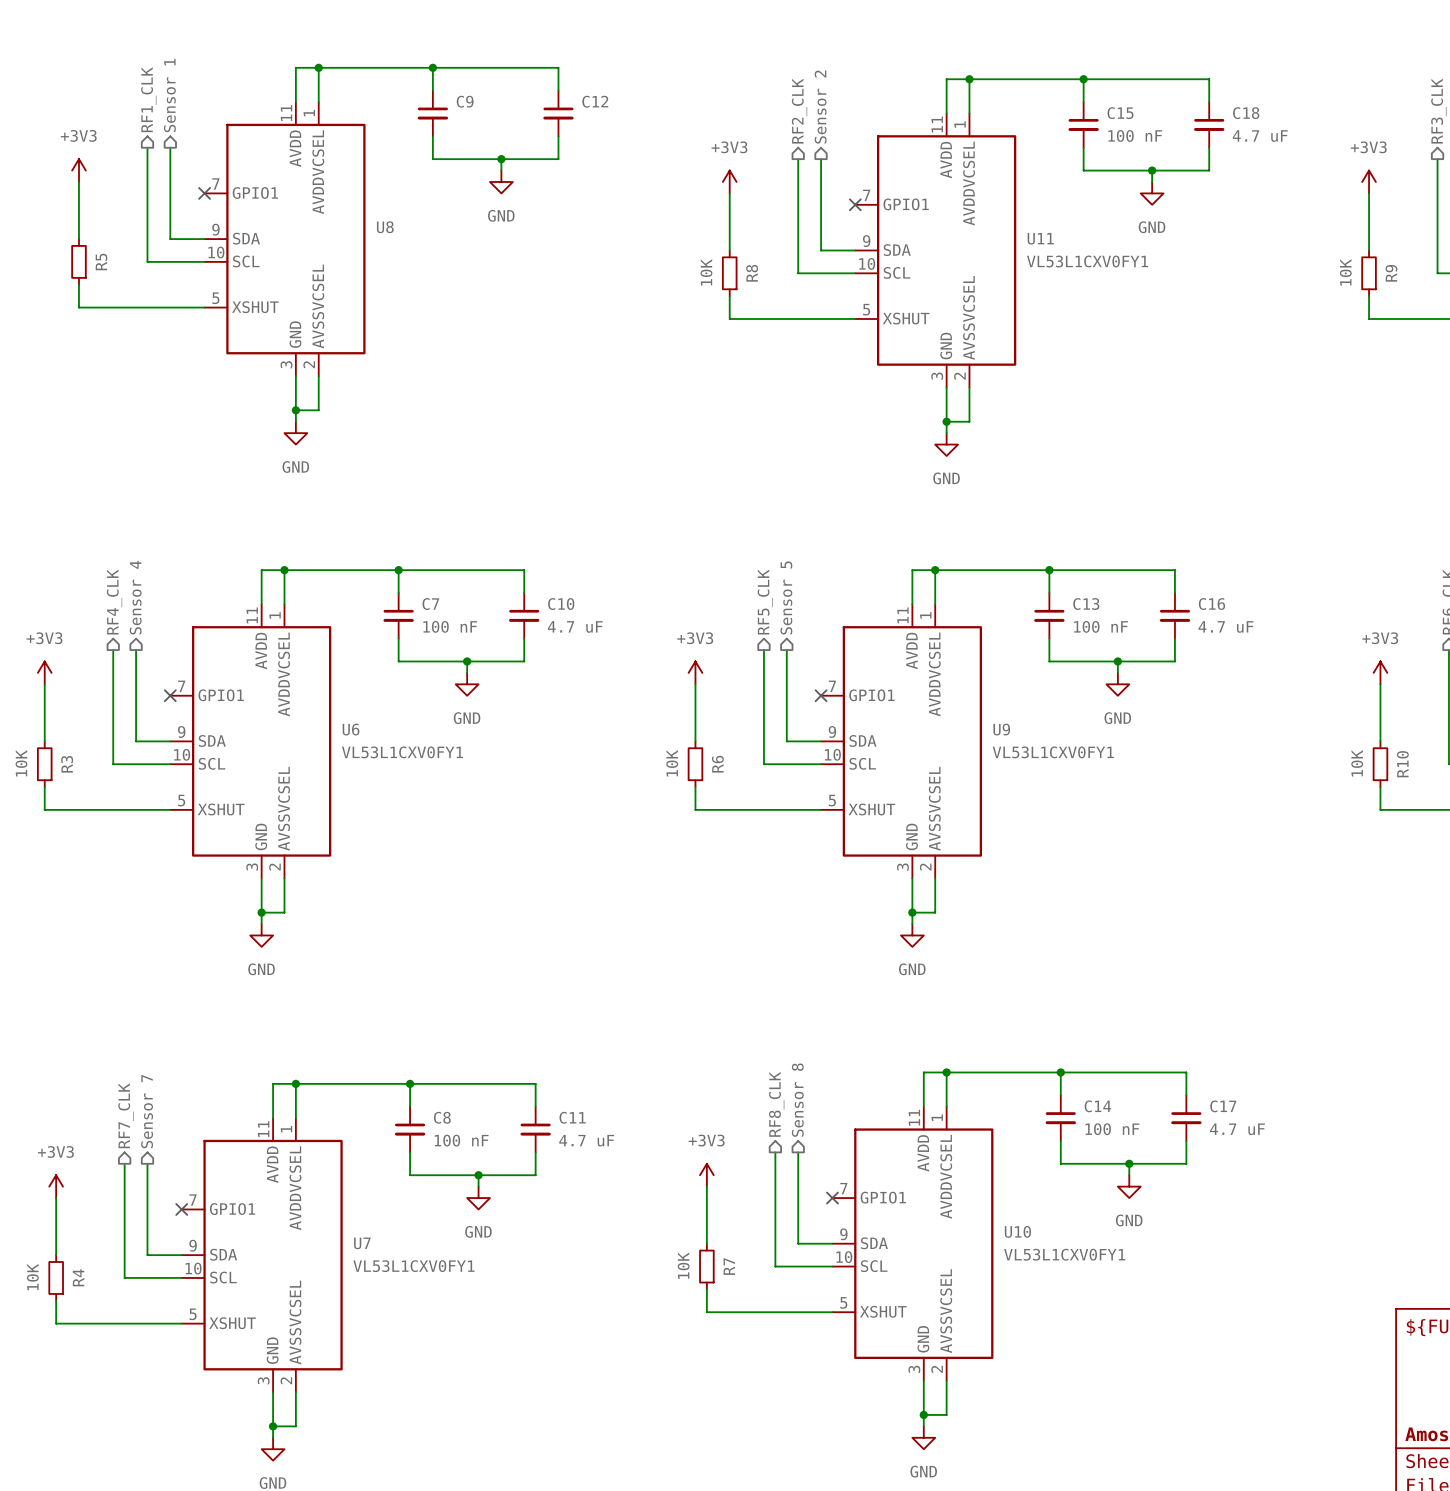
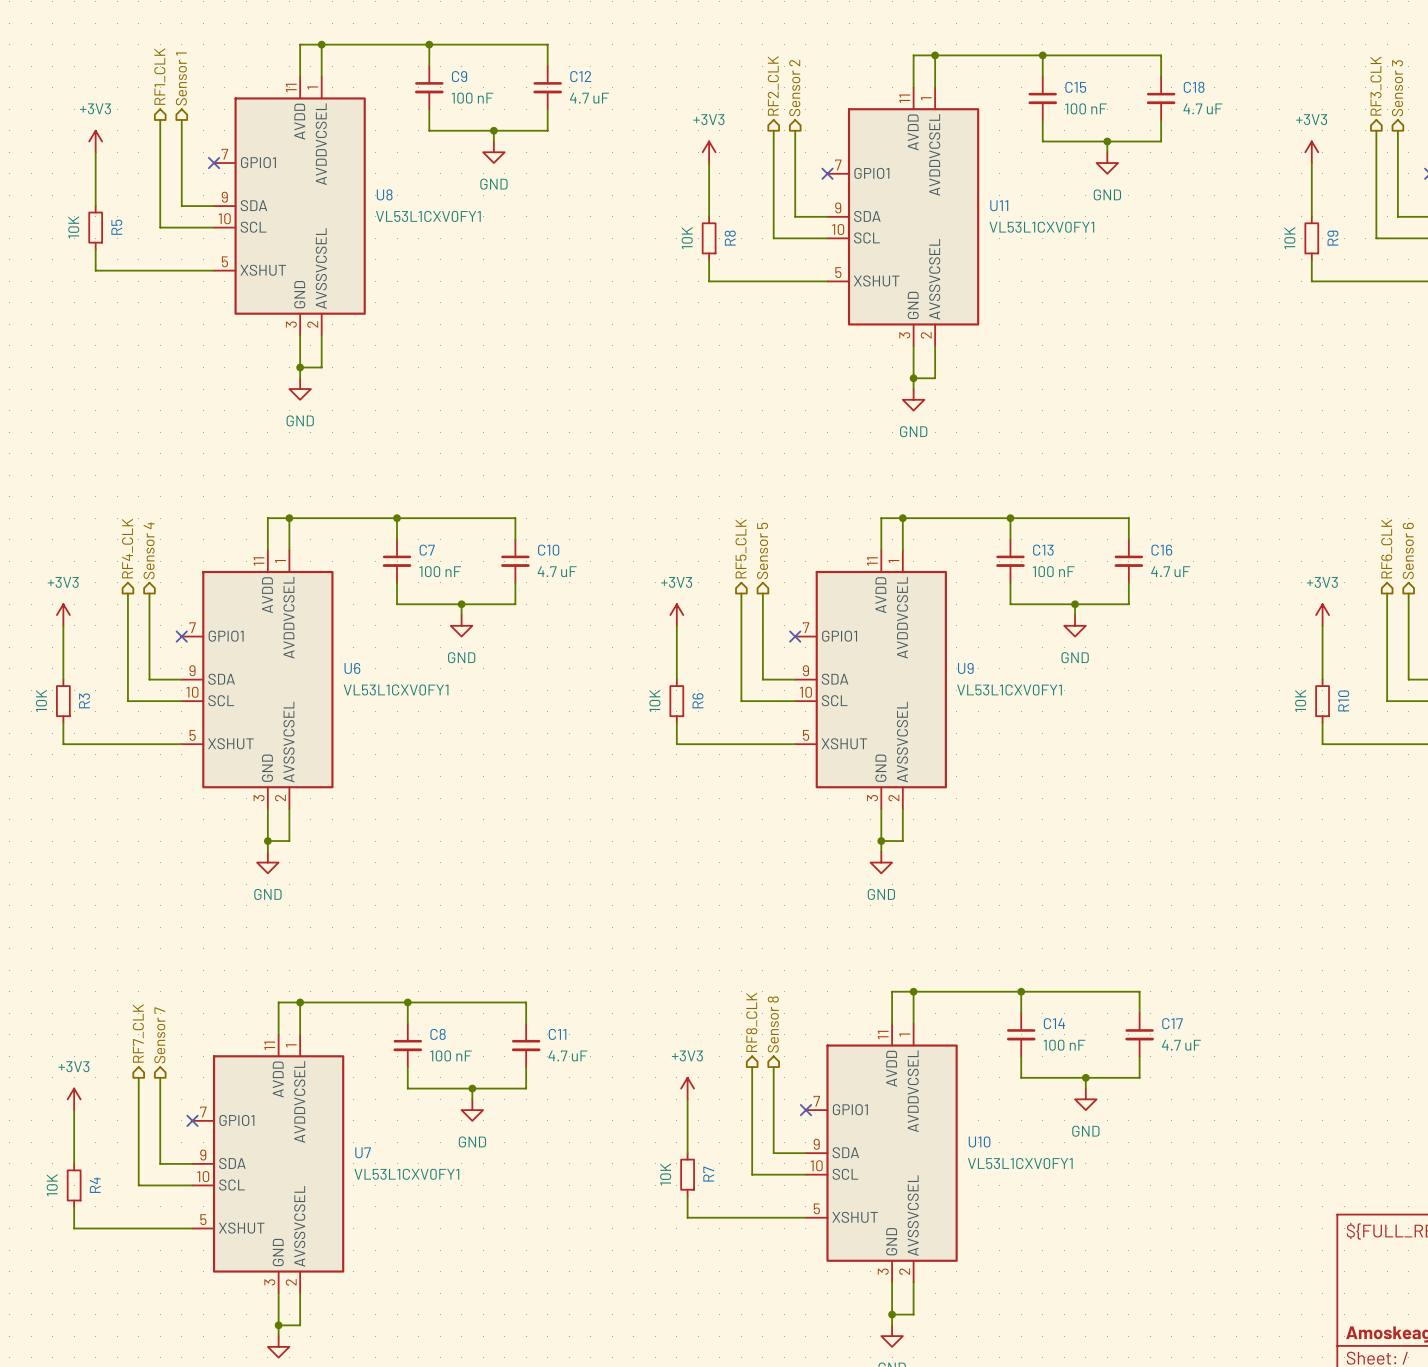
C9 value: none -> 100 nF (472, 98)
C12 value: none -> 4.7 uF (589, 98)
U8 value: none -> VL53L1CXV0FY1 (428, 216)
R5 value: none -> 10K (73, 227)

